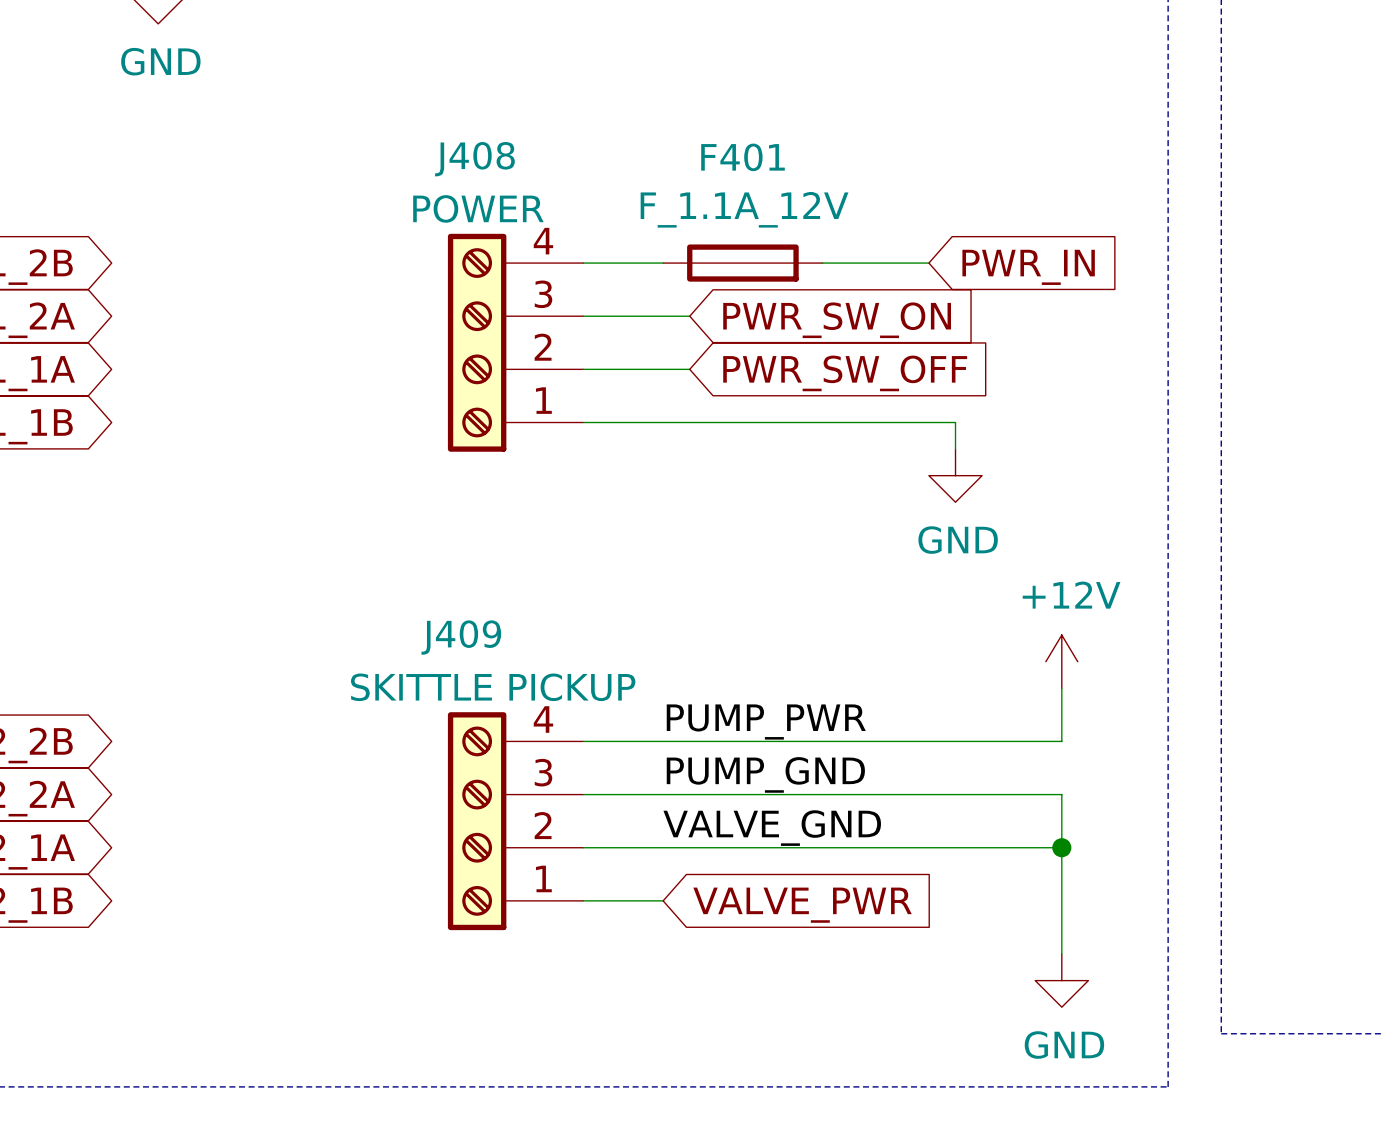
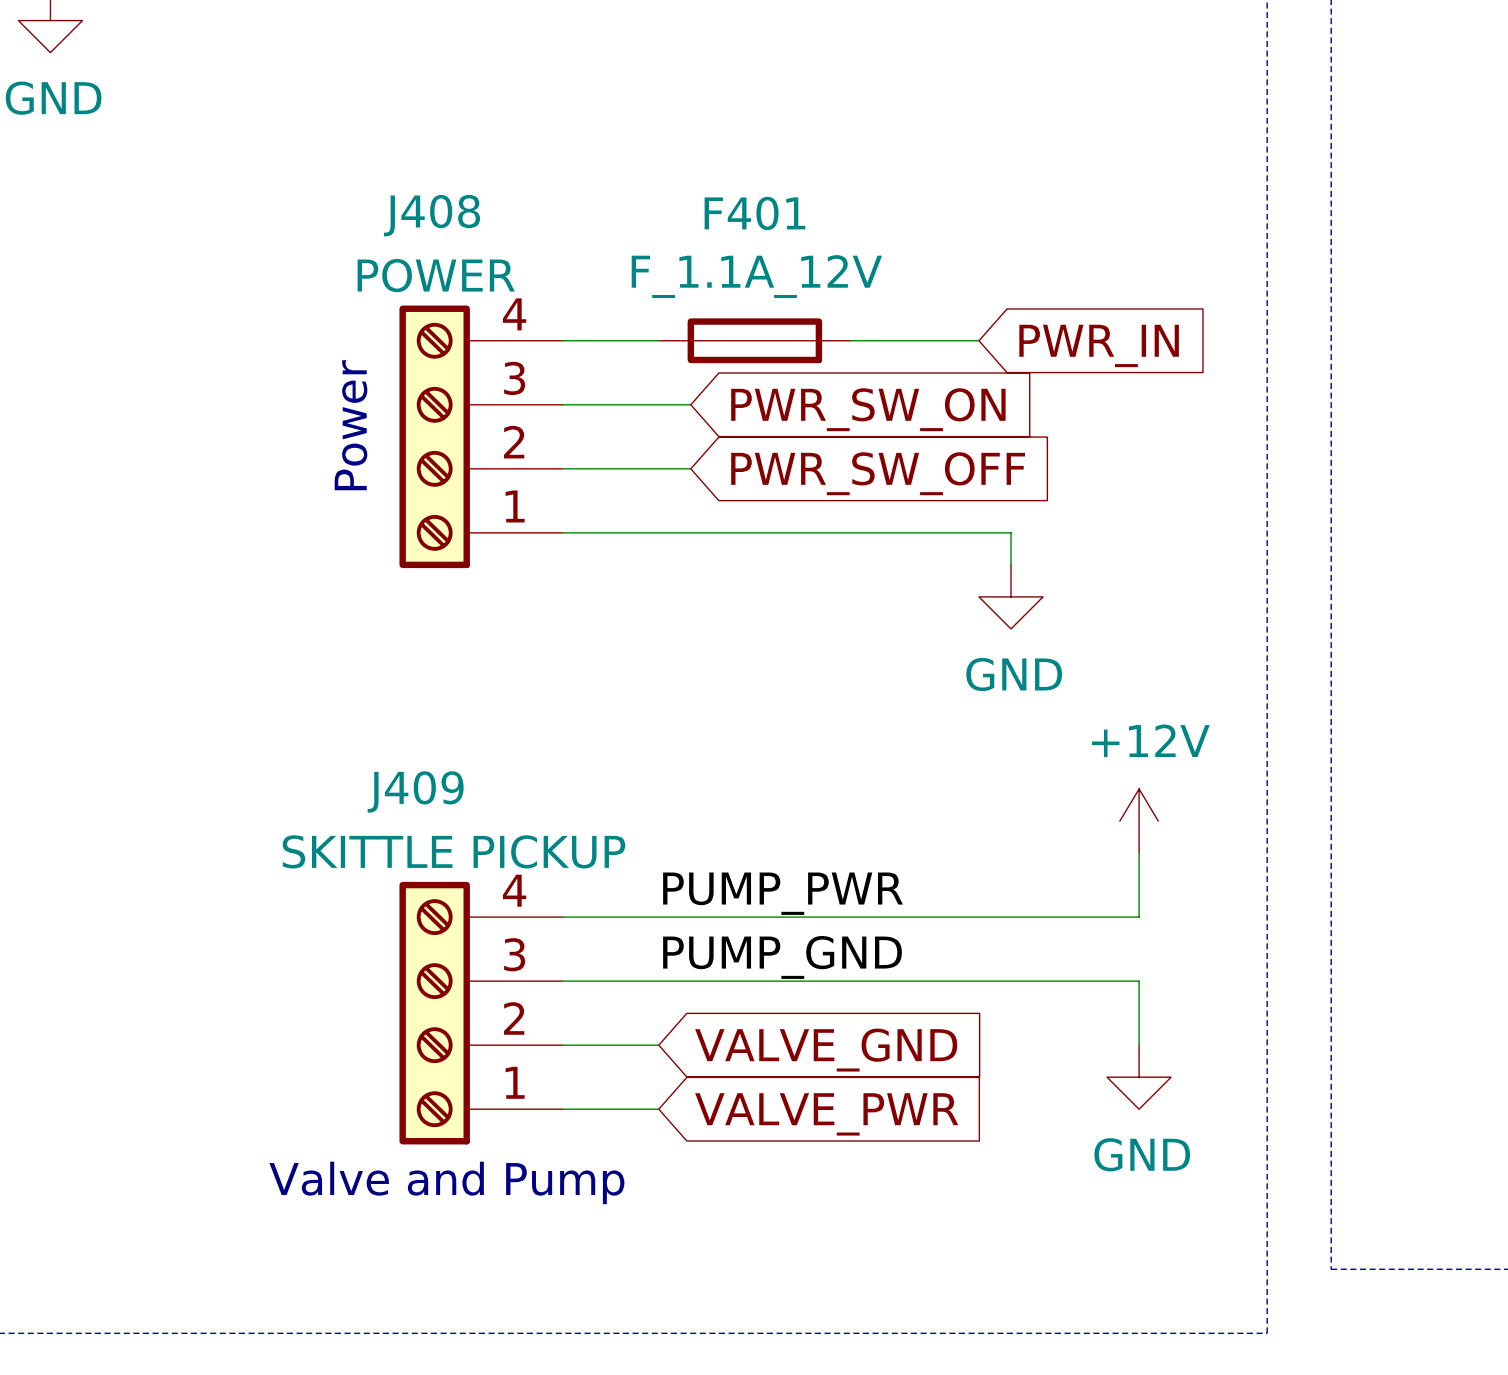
text: none -> Power (351, 425)
label: VALVE_GND (772, 828) -> none
wire: (663, 847) (1061, 847) (1061, 954) -> none
junction: (1061, 847) -> none
global label: none -> VALVE_GND (826, 1050)
text: none -> Valve and Pump (446, 1182)
power symbol position: GND (1061, 980) -> GND (1139, 1077)

